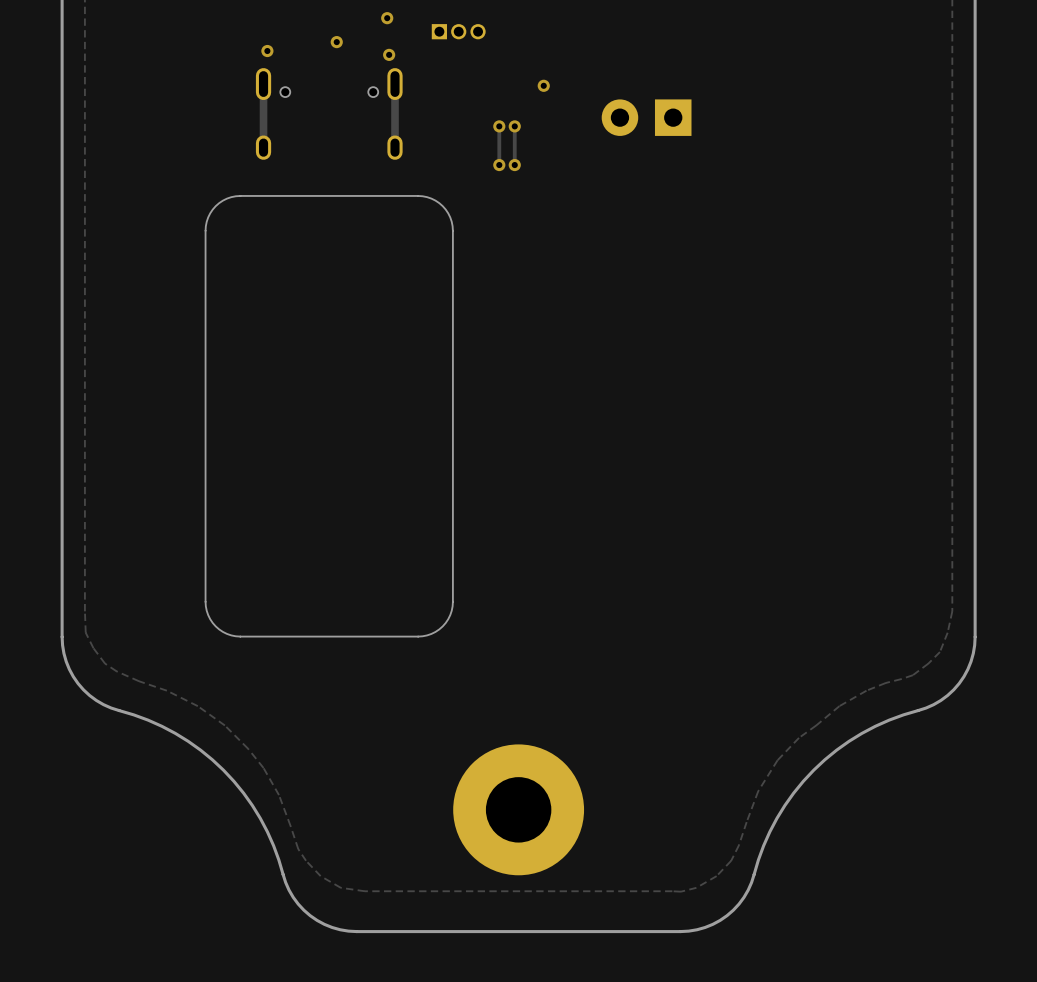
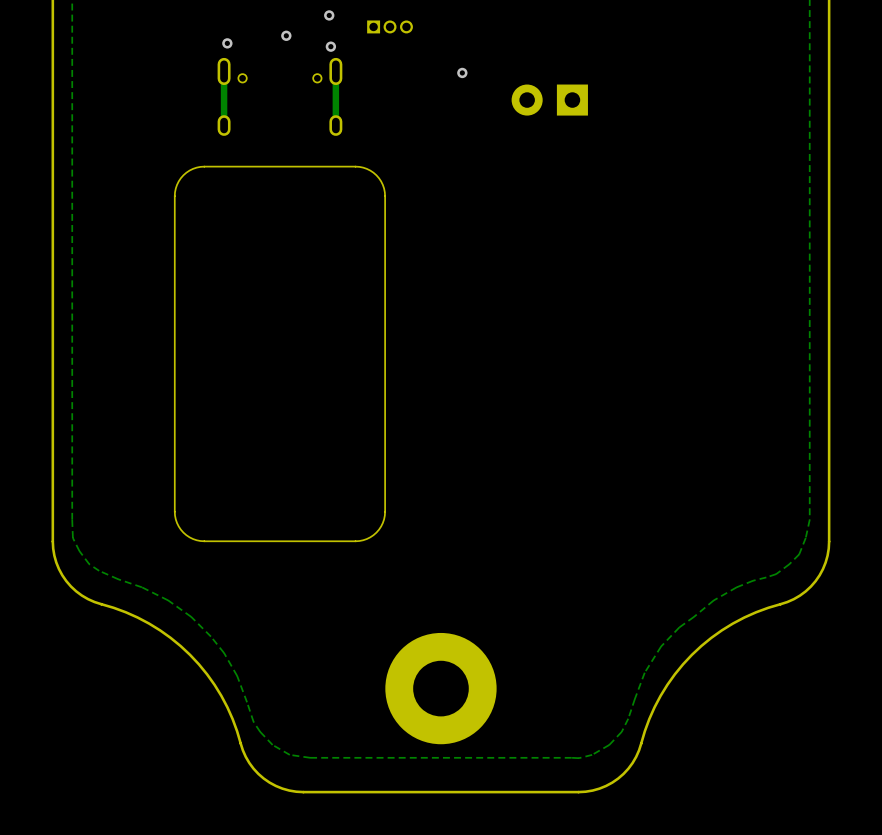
track: (499, 126) (499, 165) -> none
via: (499, 126) -> none
track: (514, 126) (514, 165) -> none
via: (514, 126) -> none
via: (499, 165) -> none
via: (514, 165) -> none

